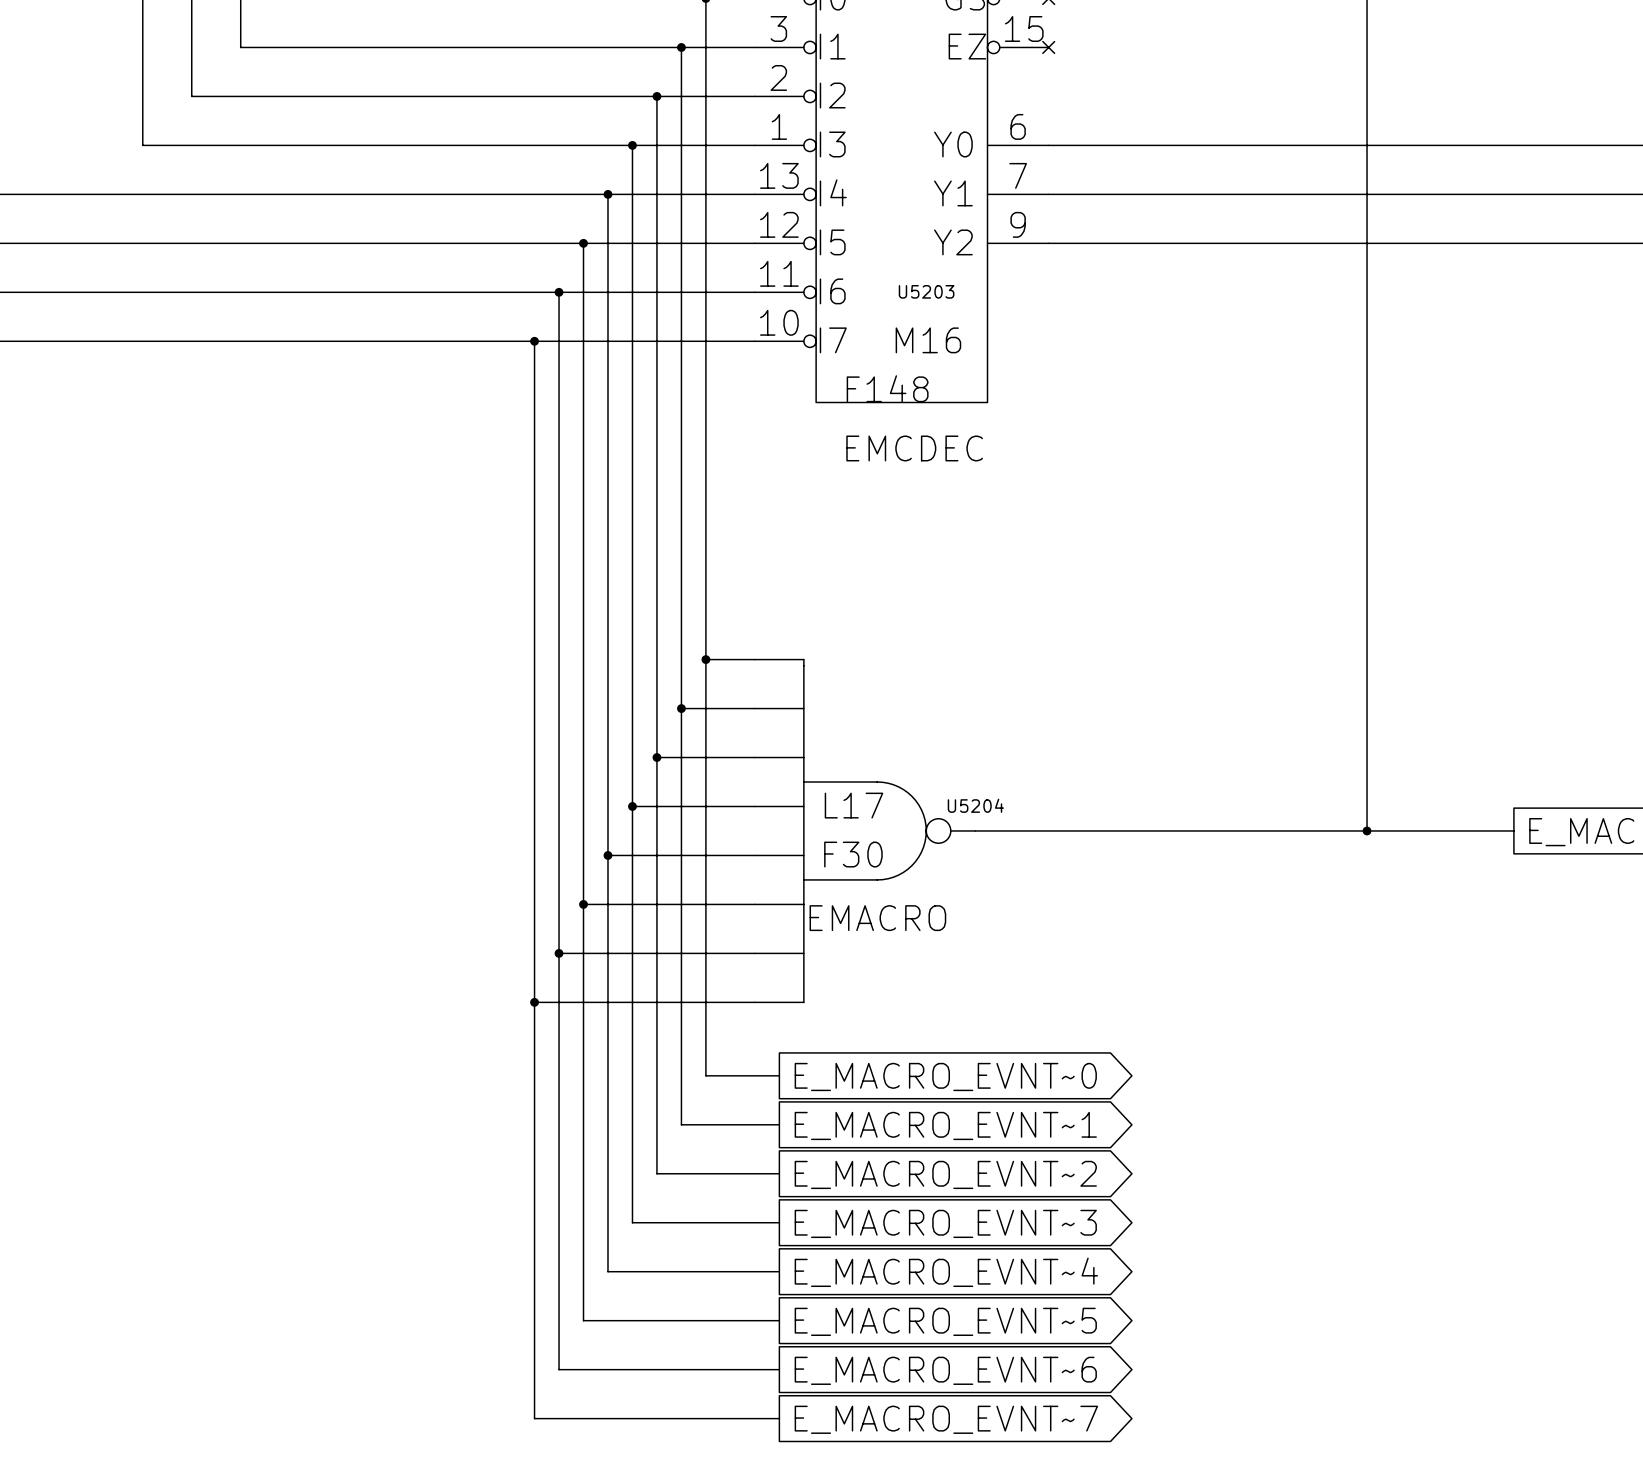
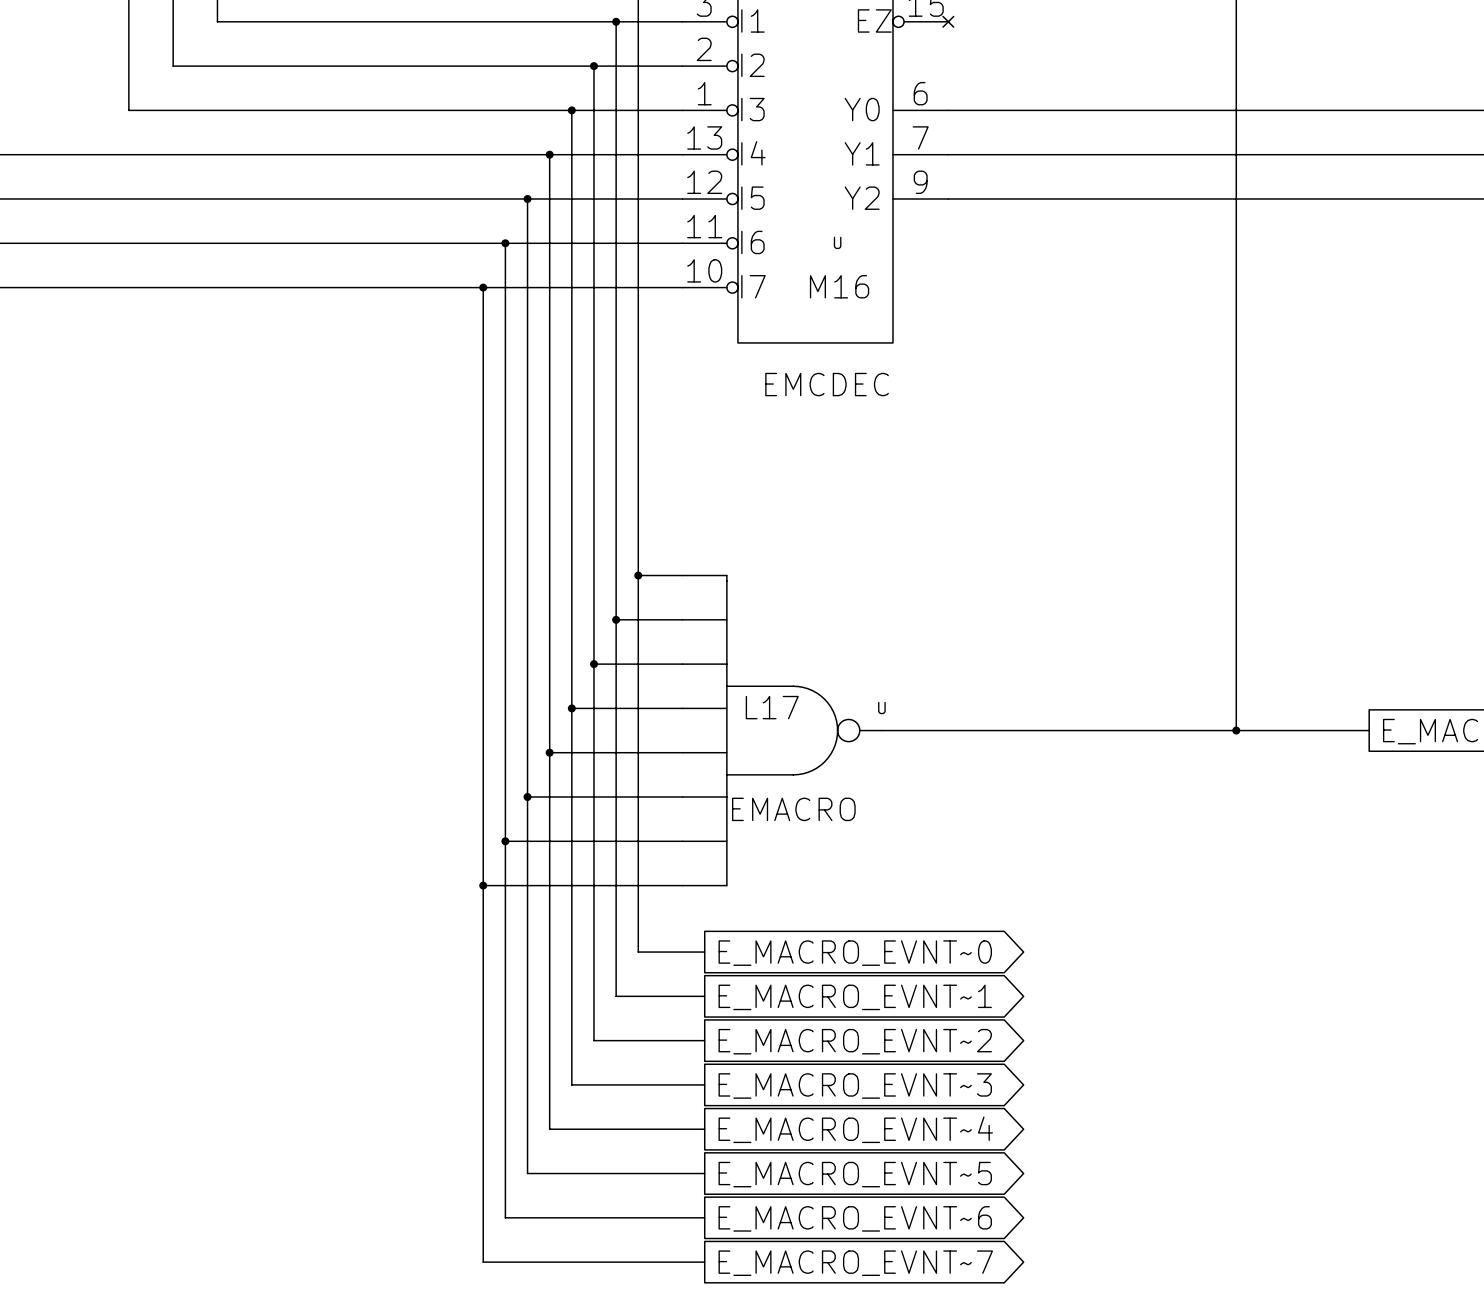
U5203 name: U5203 (926, 291) -> U (837, 242)
U5203 value: F148 (887, 388) -> none
U5204 name: U5204 (975, 805) -> U (881, 707)
U5204 value: F30 (853, 854) -> none

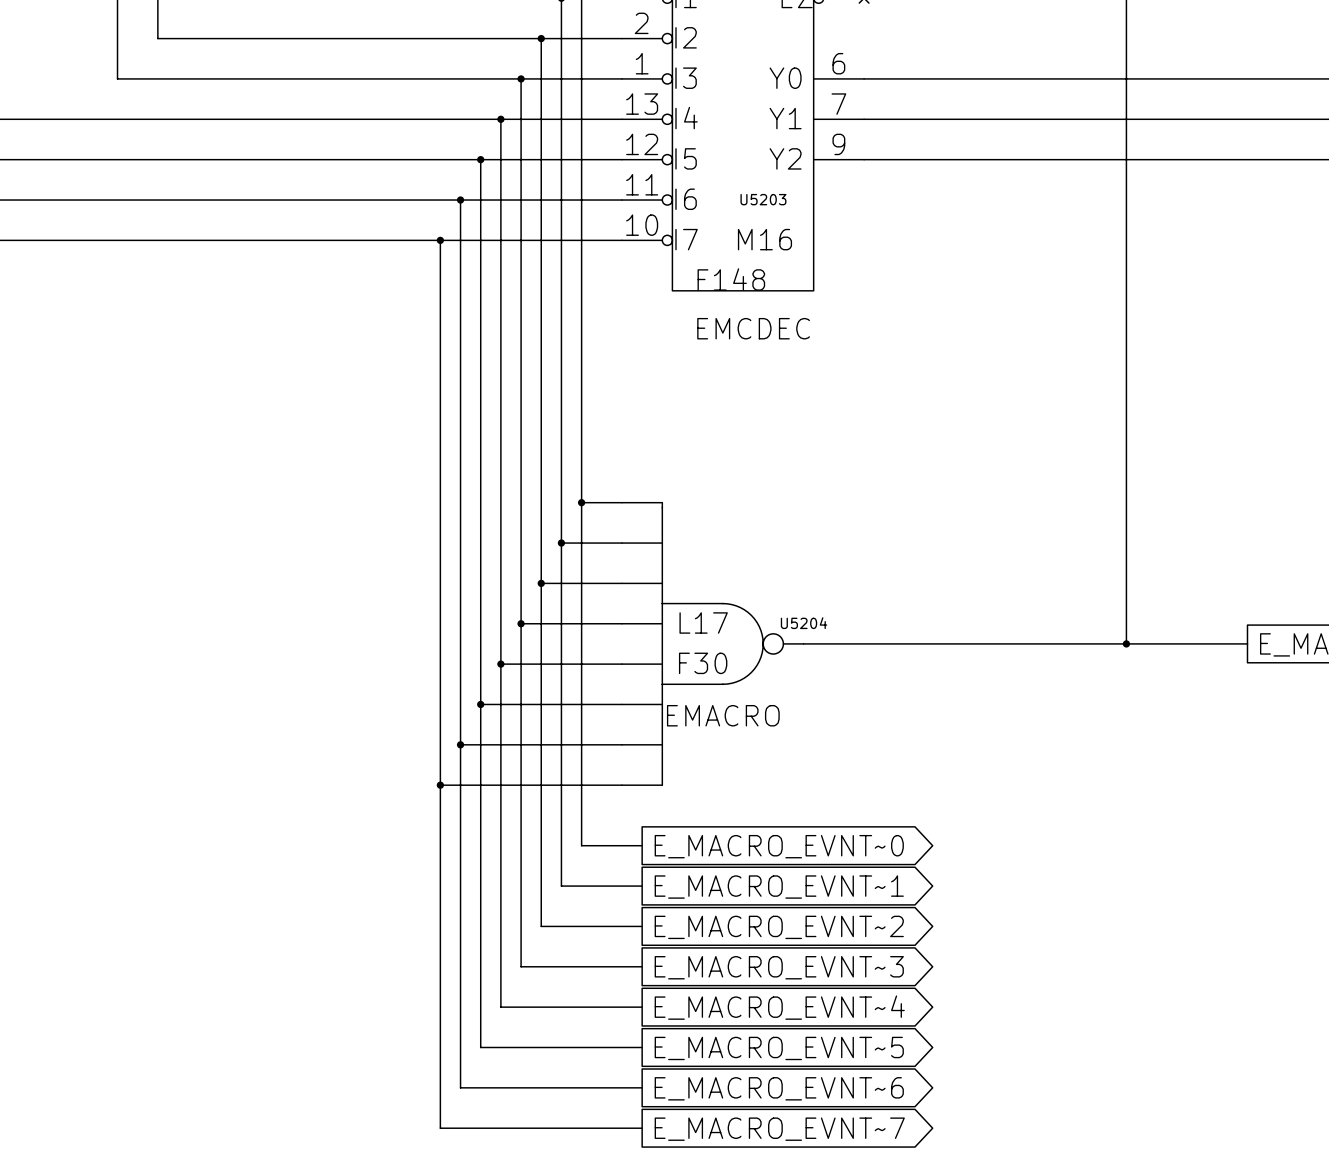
U name: U (837, 242) -> U5203 (763, 199)
U value: none -> F148 (731, 279)
U name: U (881, 707) -> U5204 (804, 623)
U value: none -> F30 (703, 663)

